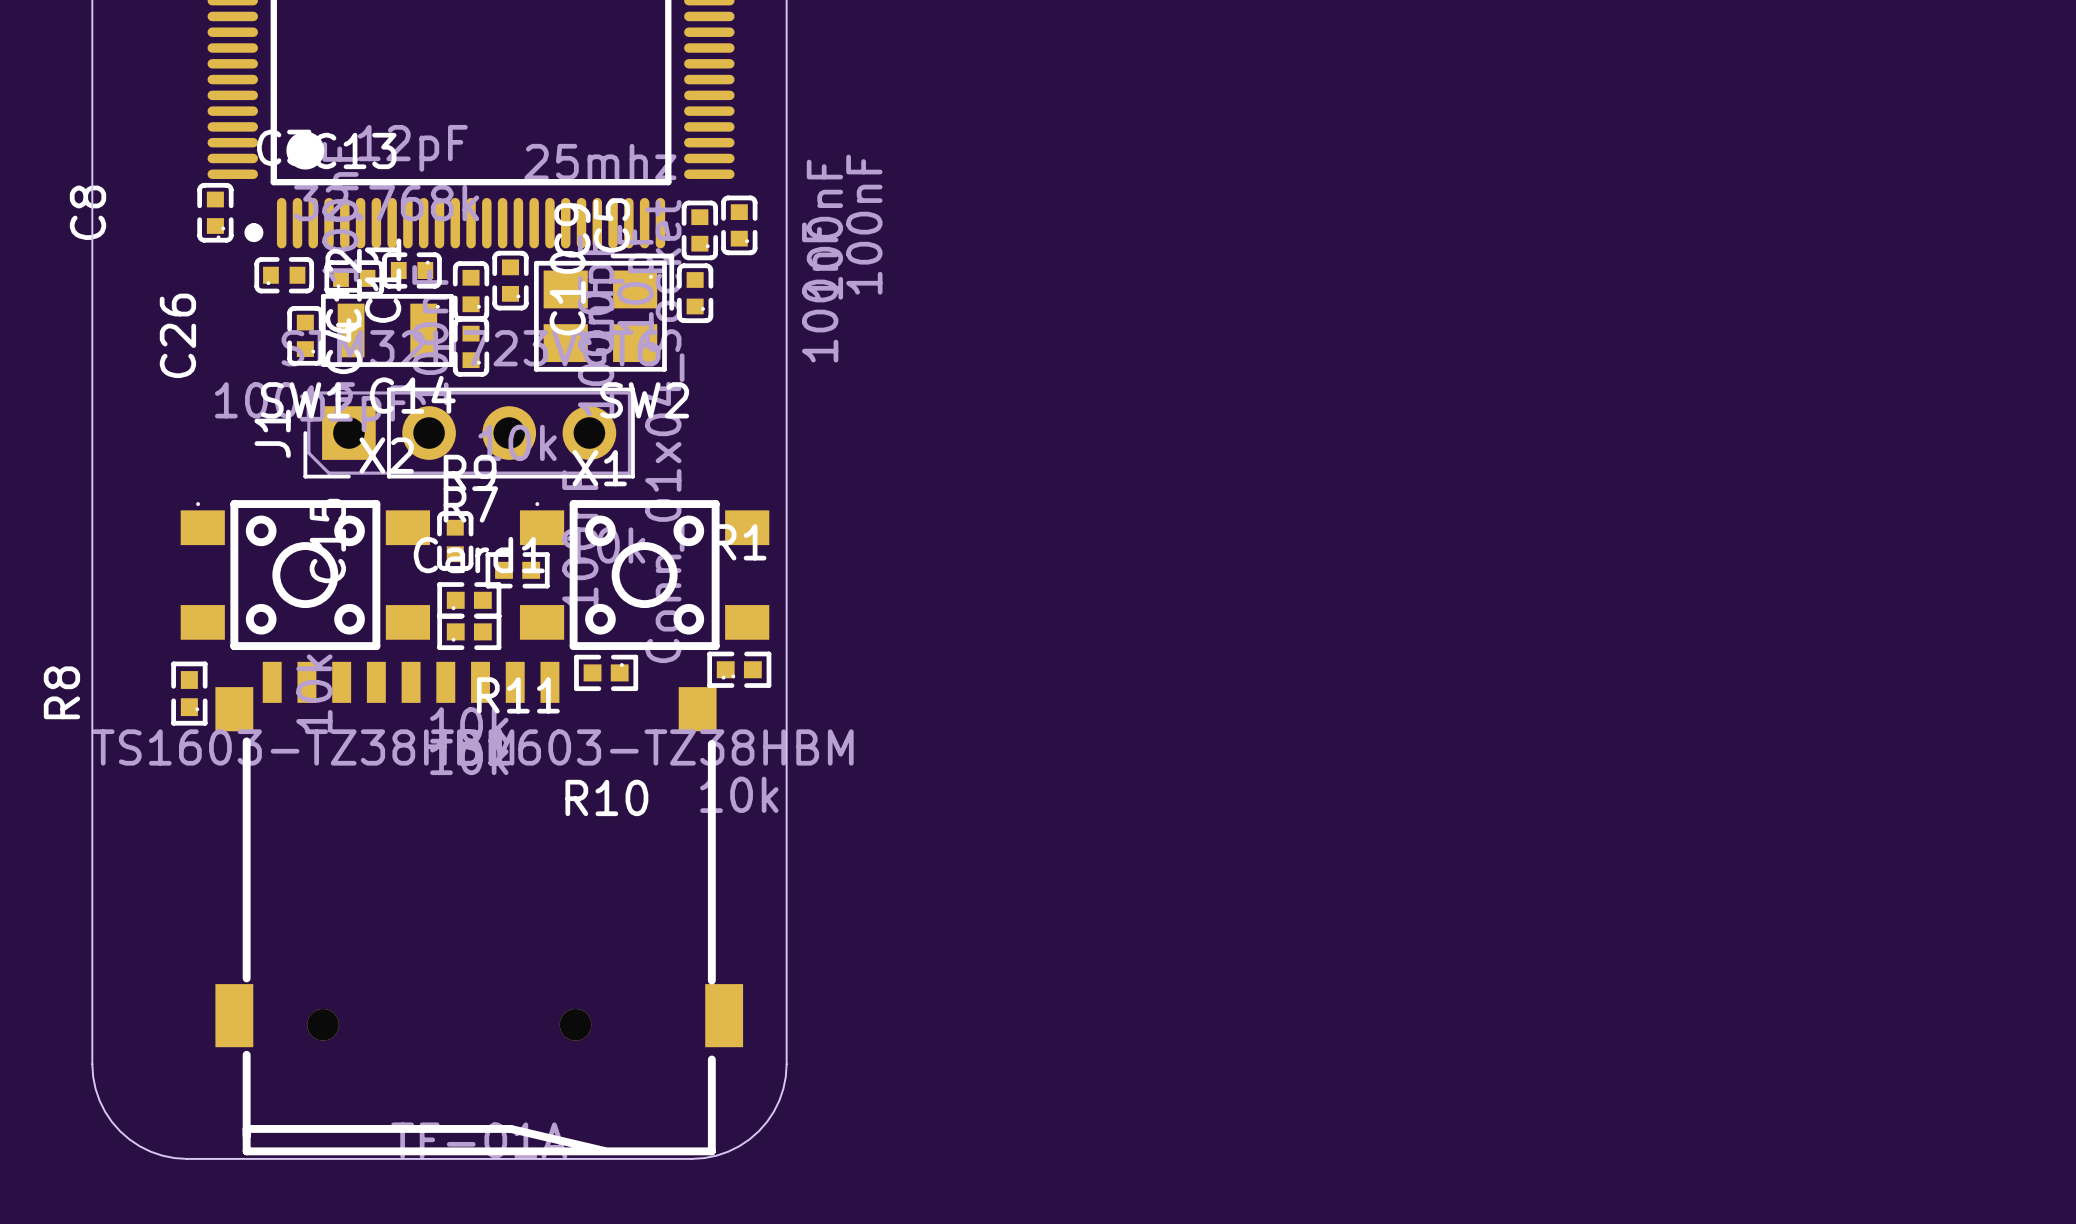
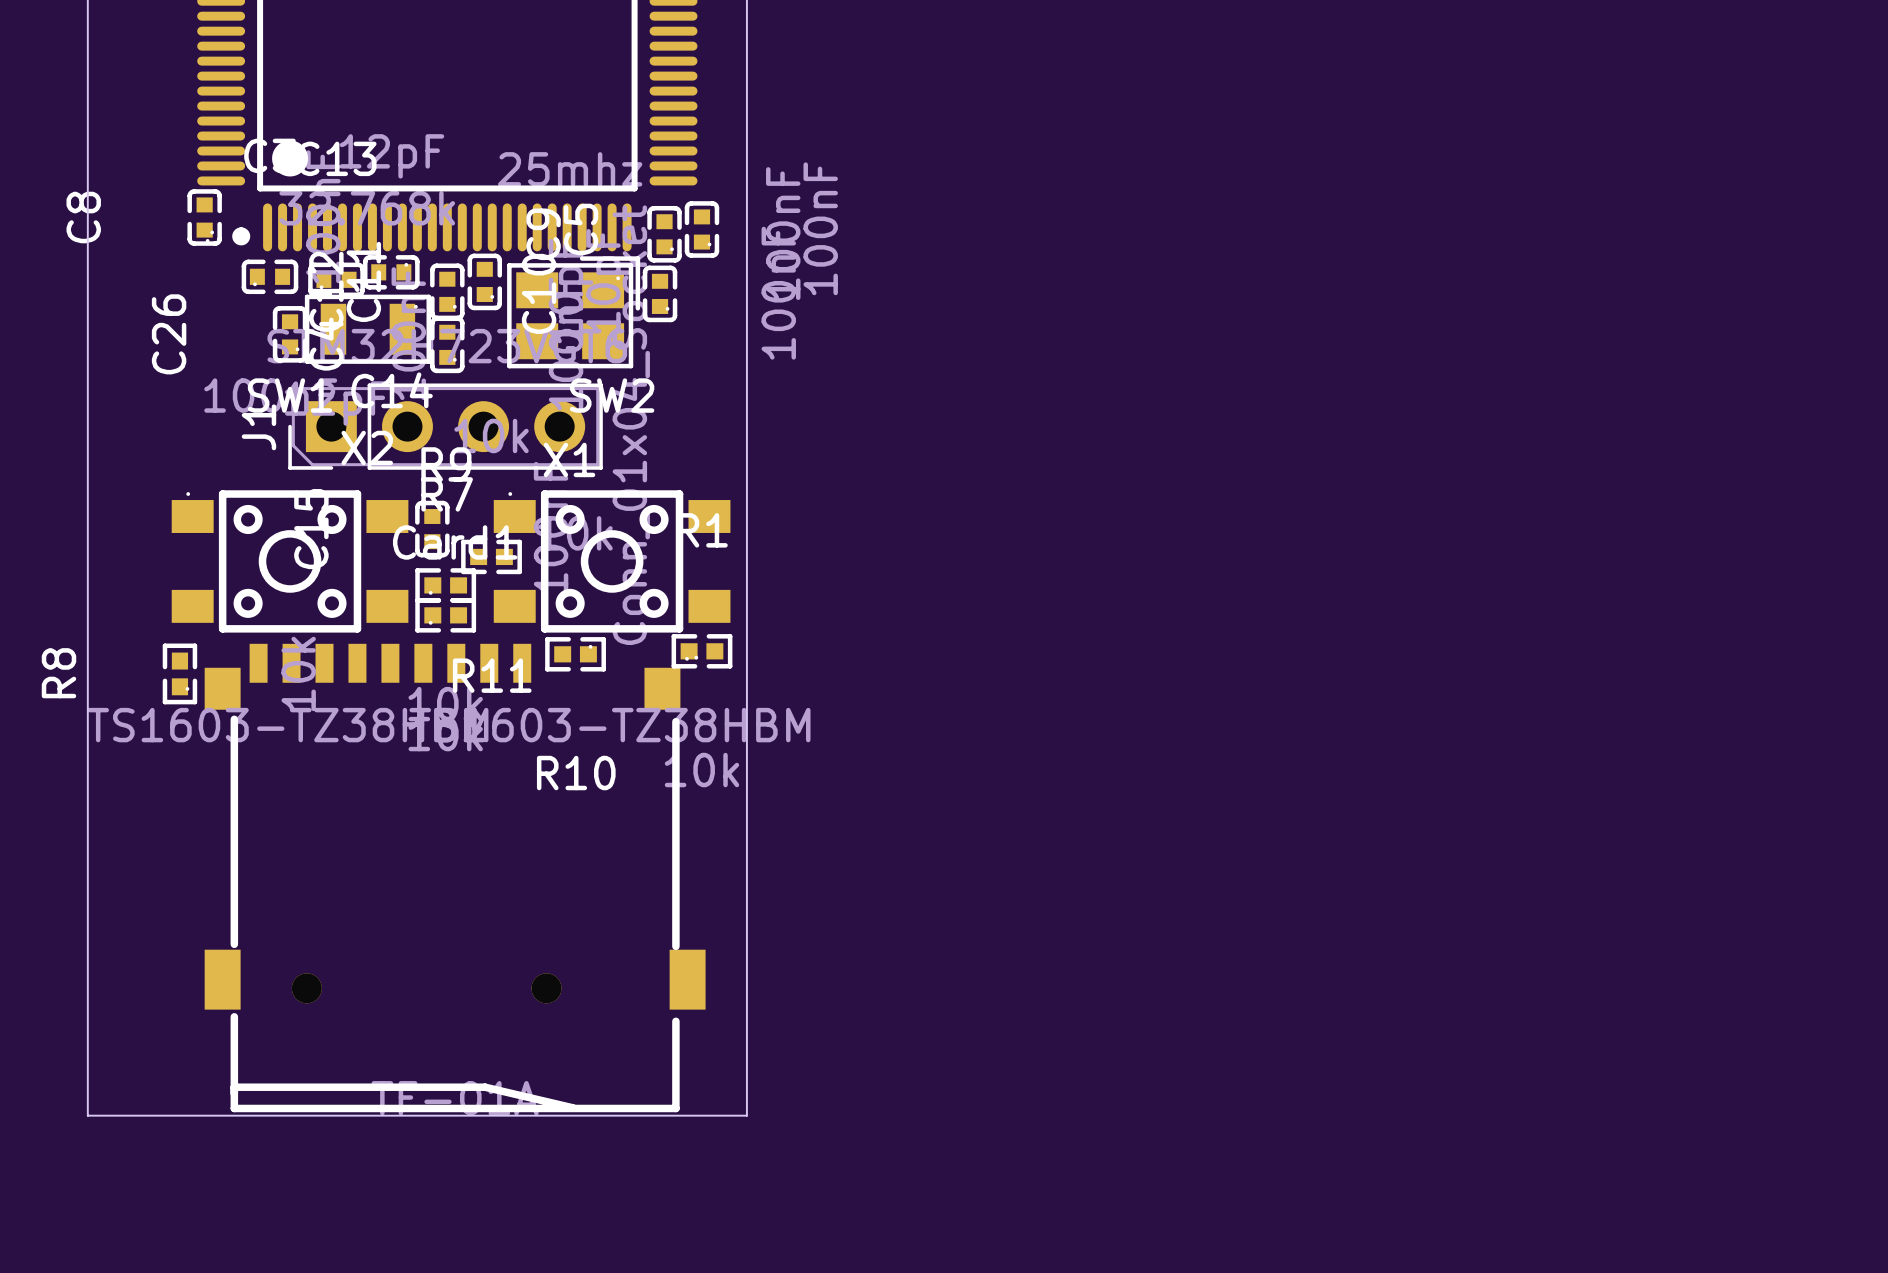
board edge: (92, 1064) (93, 1076) (99, 1100) (111, 1121) (120, 1131) (129, 1139) (150, 1151) (174, 1158) (187, 1158) -> (87, 1025) (87, 1115) (177, 1115)
board edge: (786, 1064) (783, 1088) (779, 1100) (767, 1121) (758, 1131) (739, 1146) (728, 1151) (704, 1158) (691, 1158) -> (746, 1025) (746, 1115) (657, 1115)

